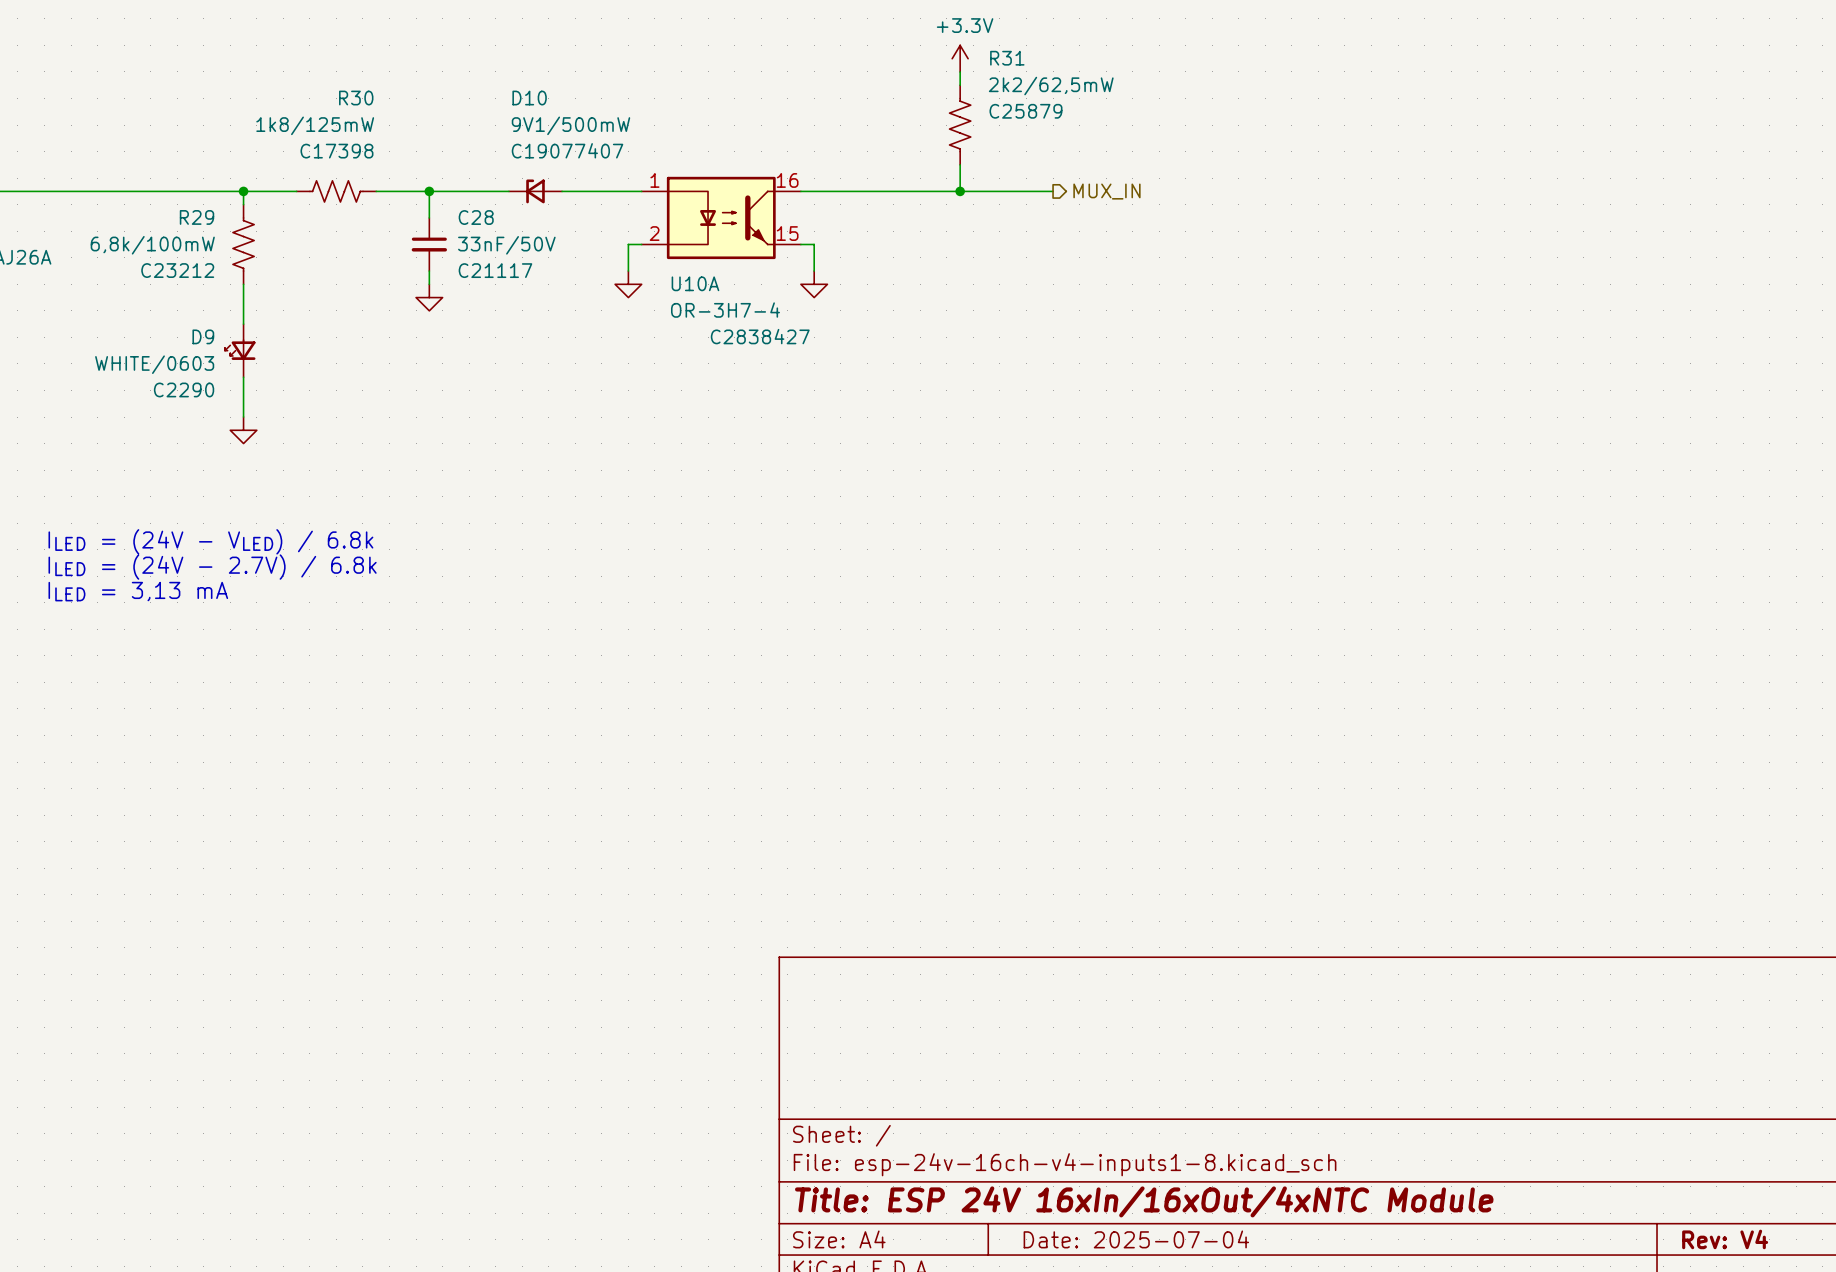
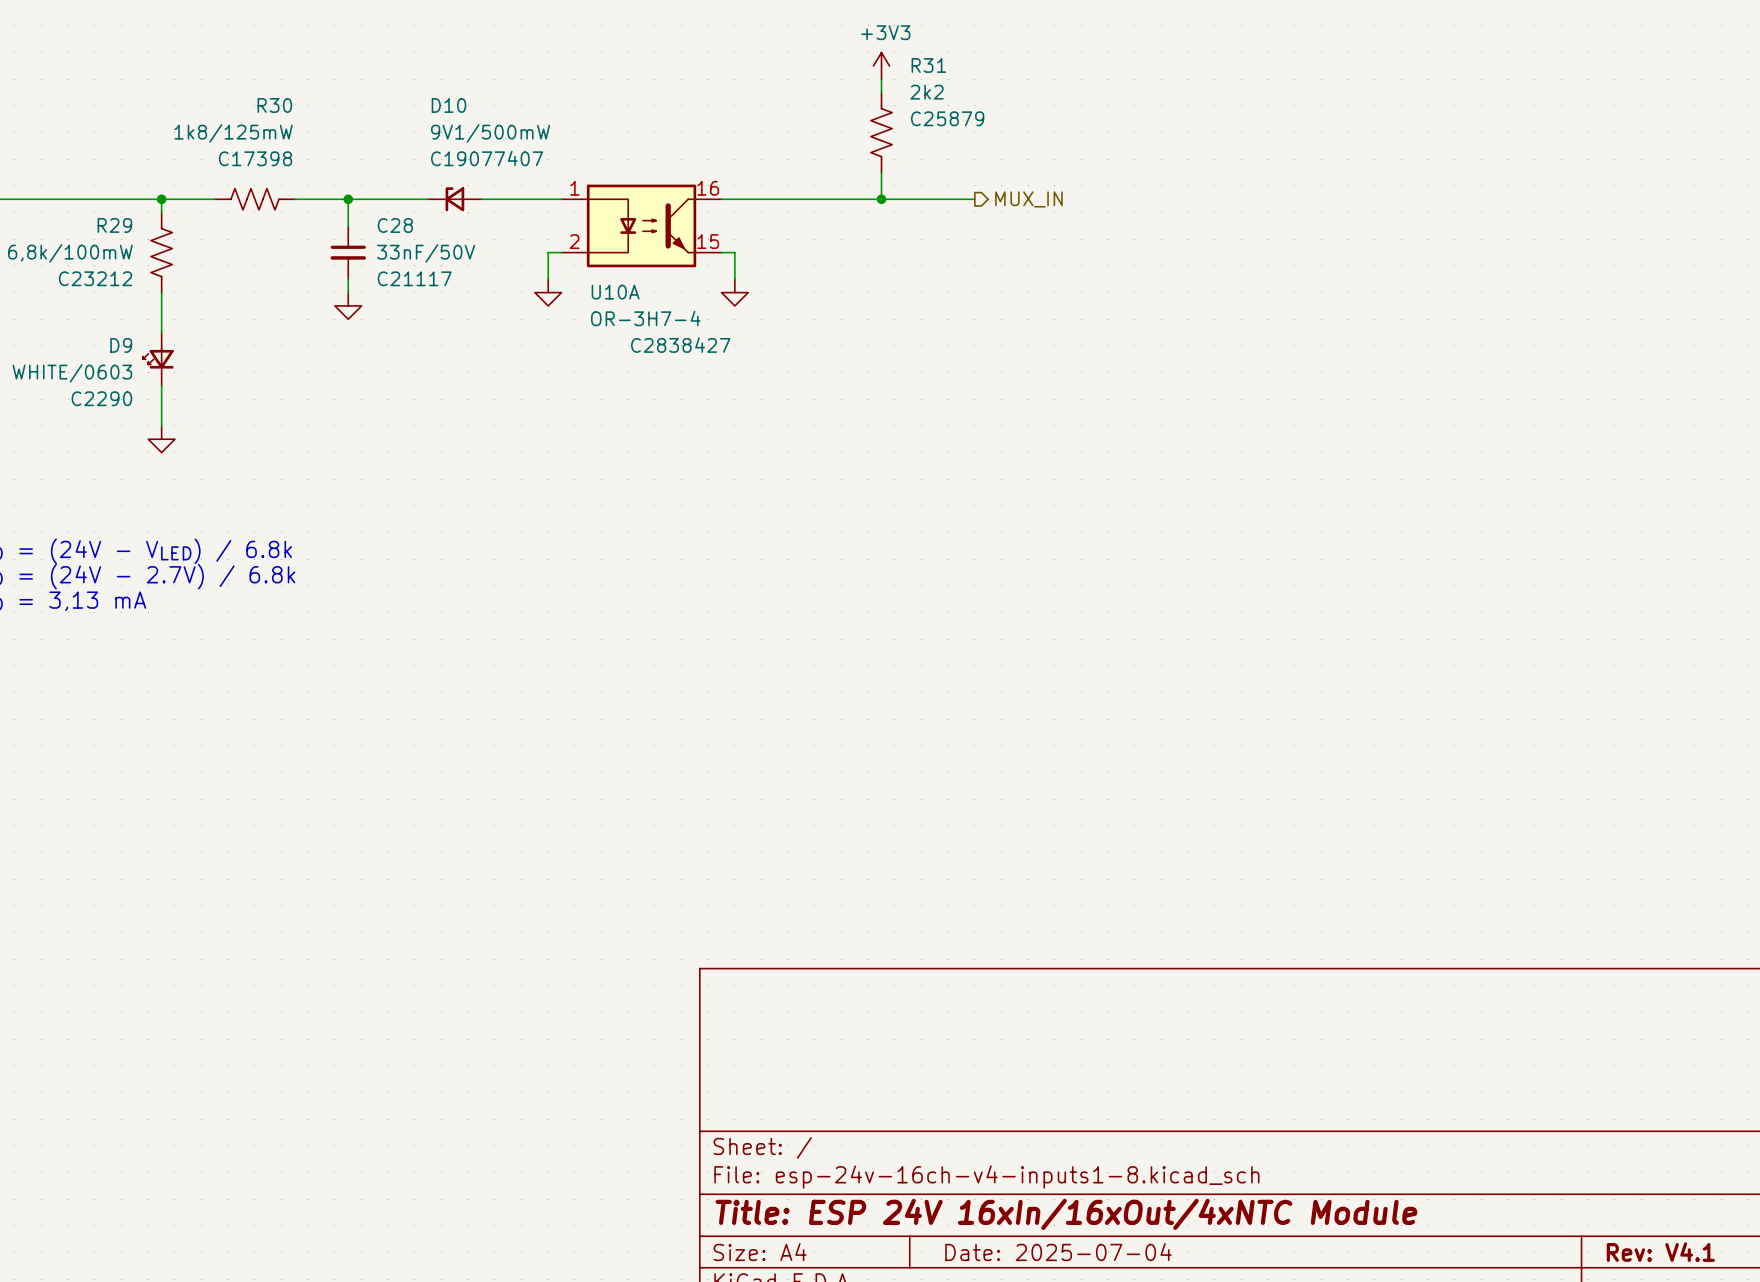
power symbol: +3.3V (960, 58) -> +3V3 (881, 65)
R31 value: 2k2/62,5mW (1051, 86) -> 2k2 (926, 92)
title block: Rev: V4 (1725, 1239) -> Rev: V4.1 (1660, 1252)

